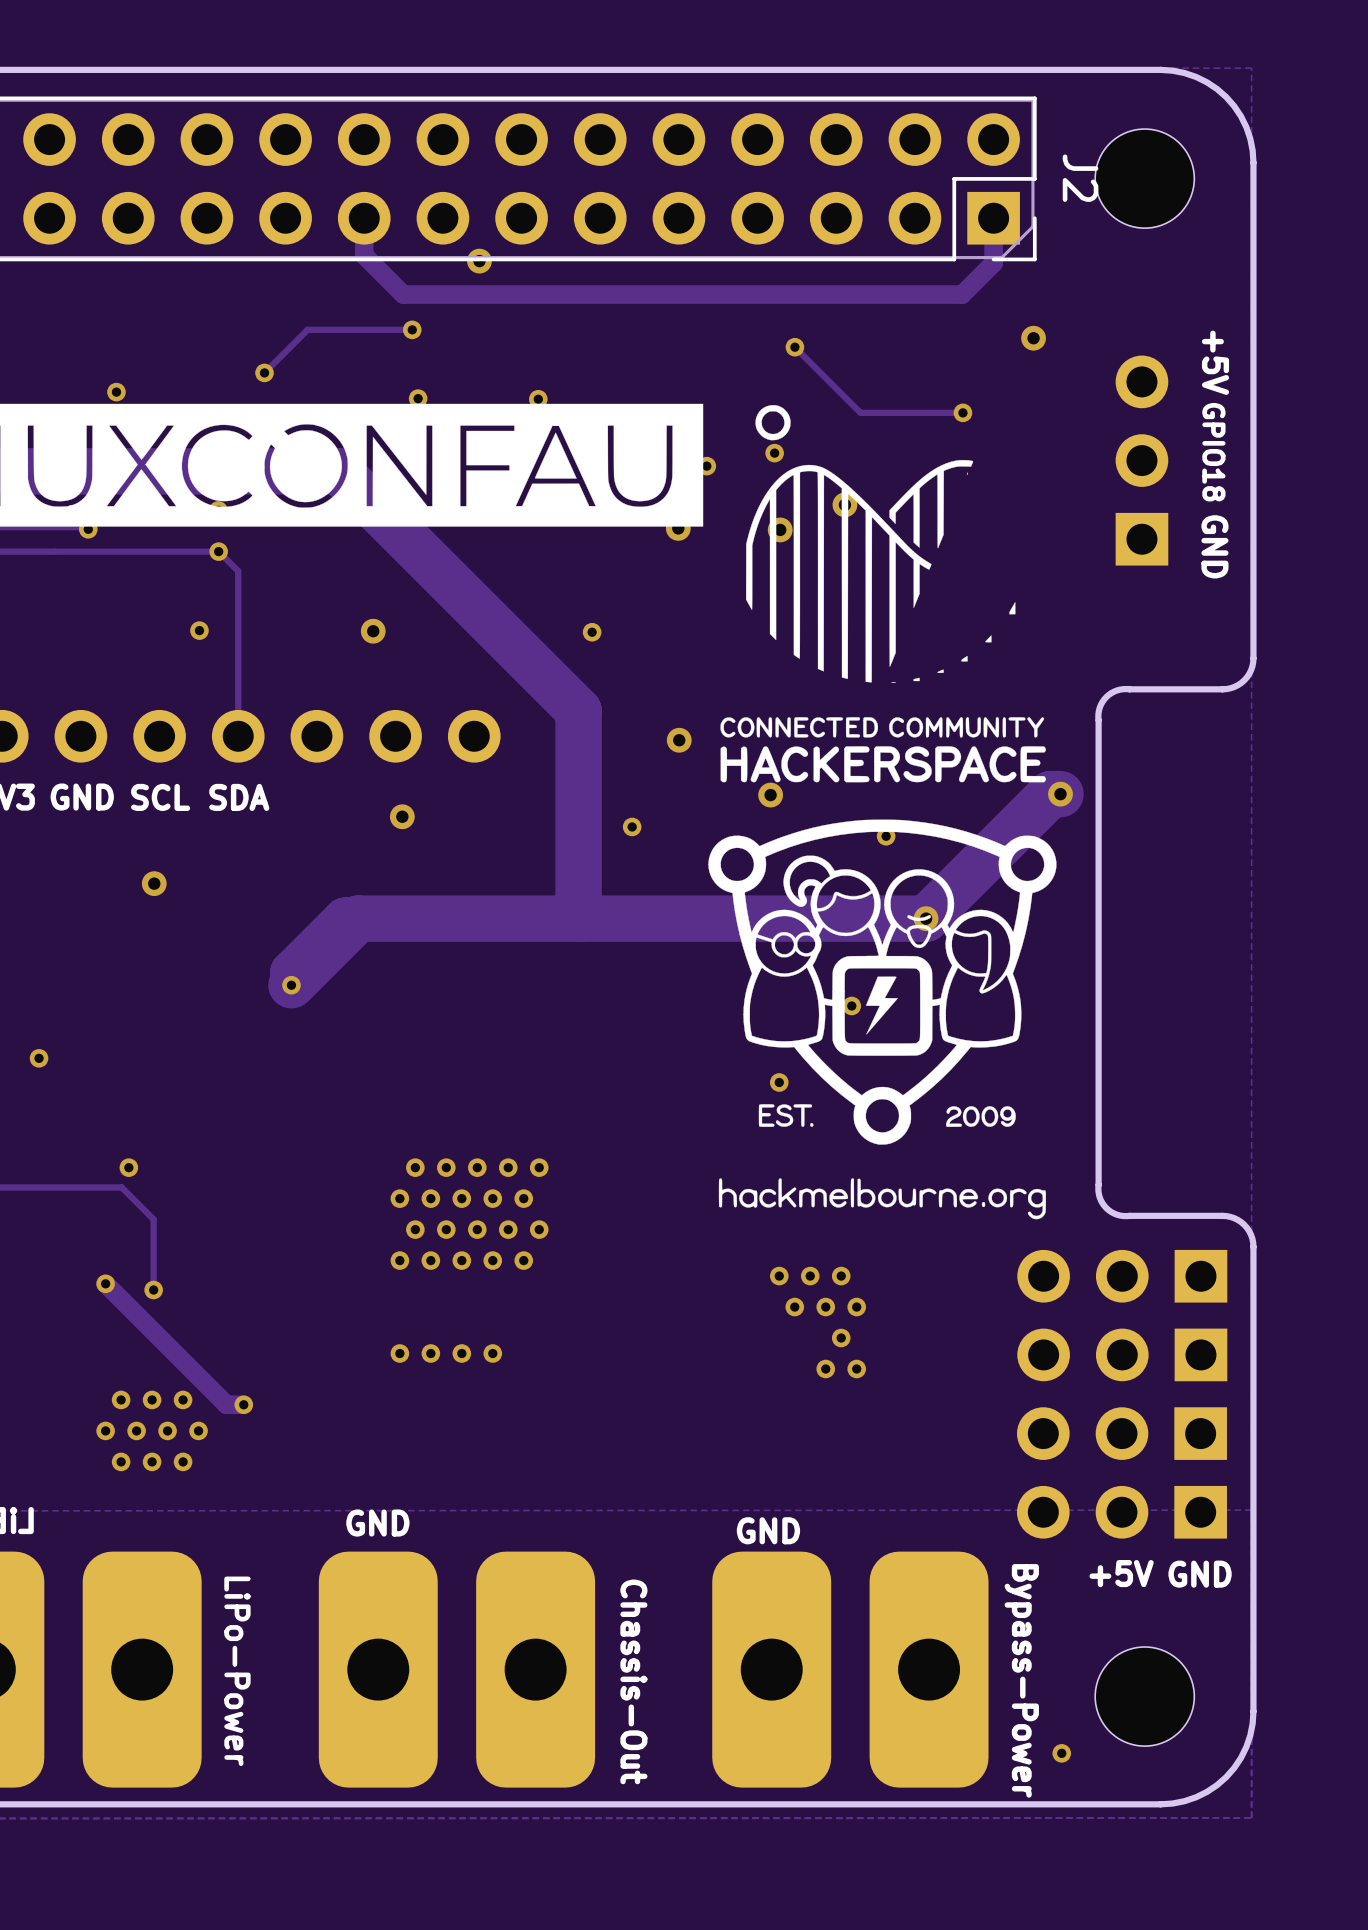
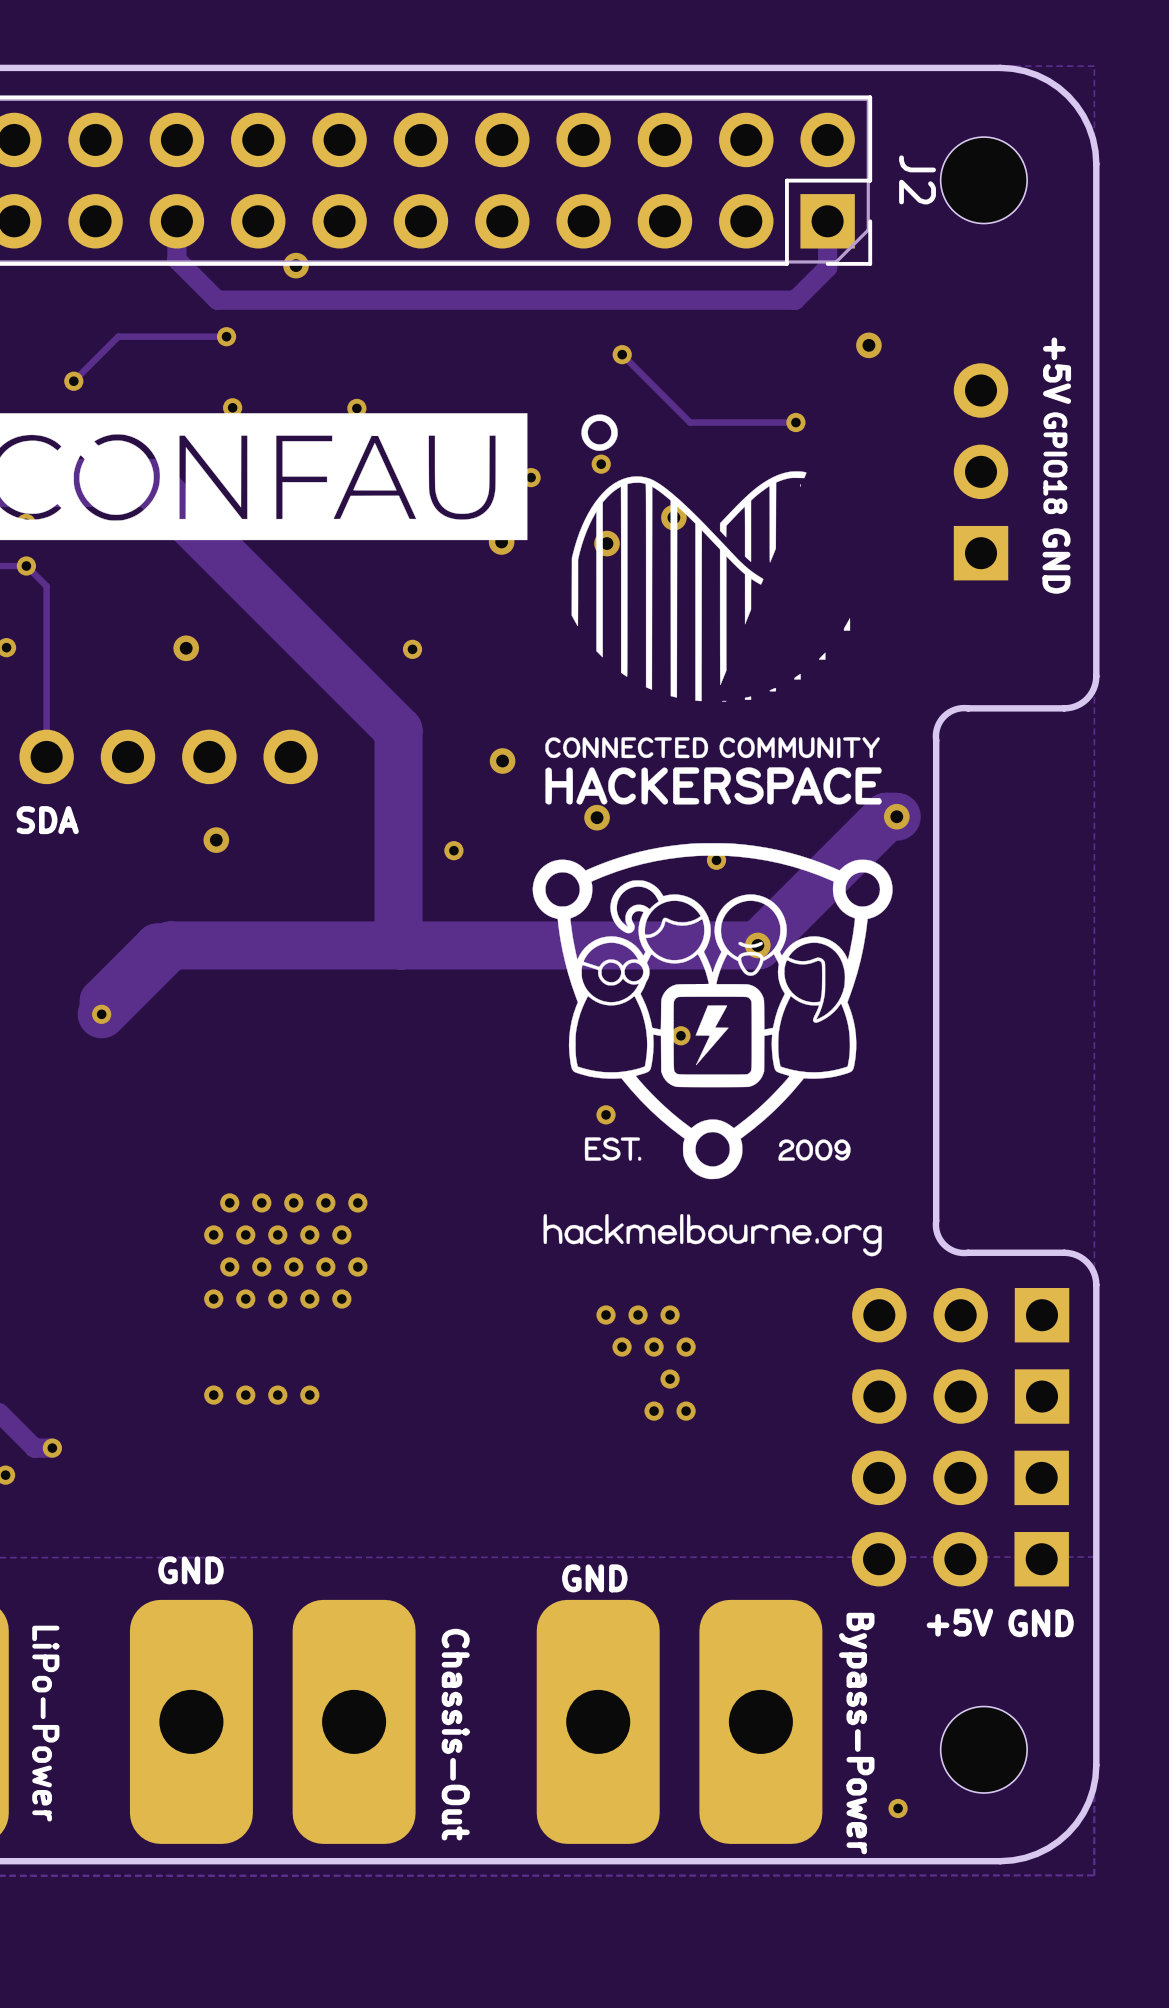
part footprint: [1095, 129, 1195, 229] -> [940, 137, 1028, 224]
part footprint: [1095, 1646, 1195, 1747] -> [940, 1706, 1028, 1793]

